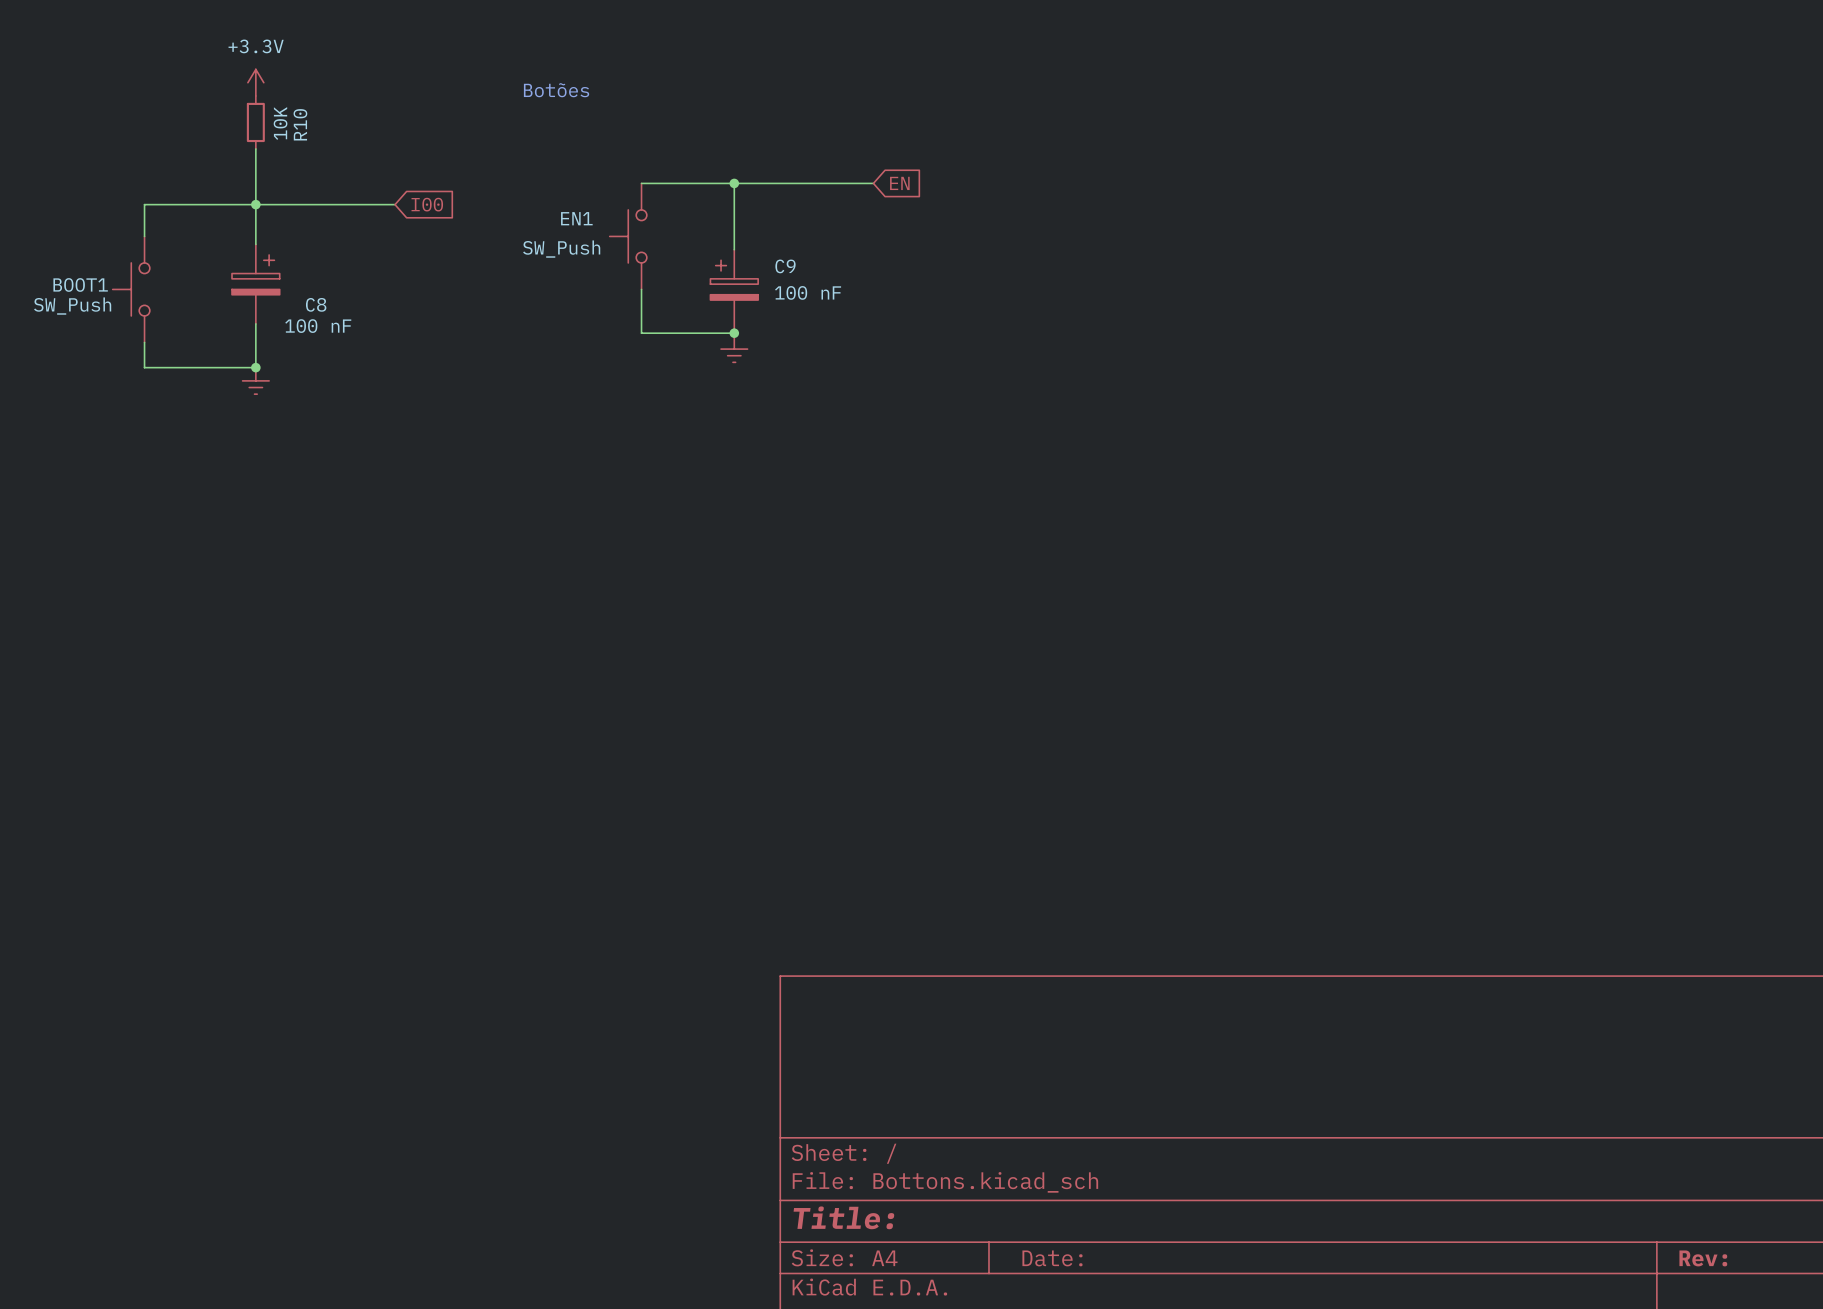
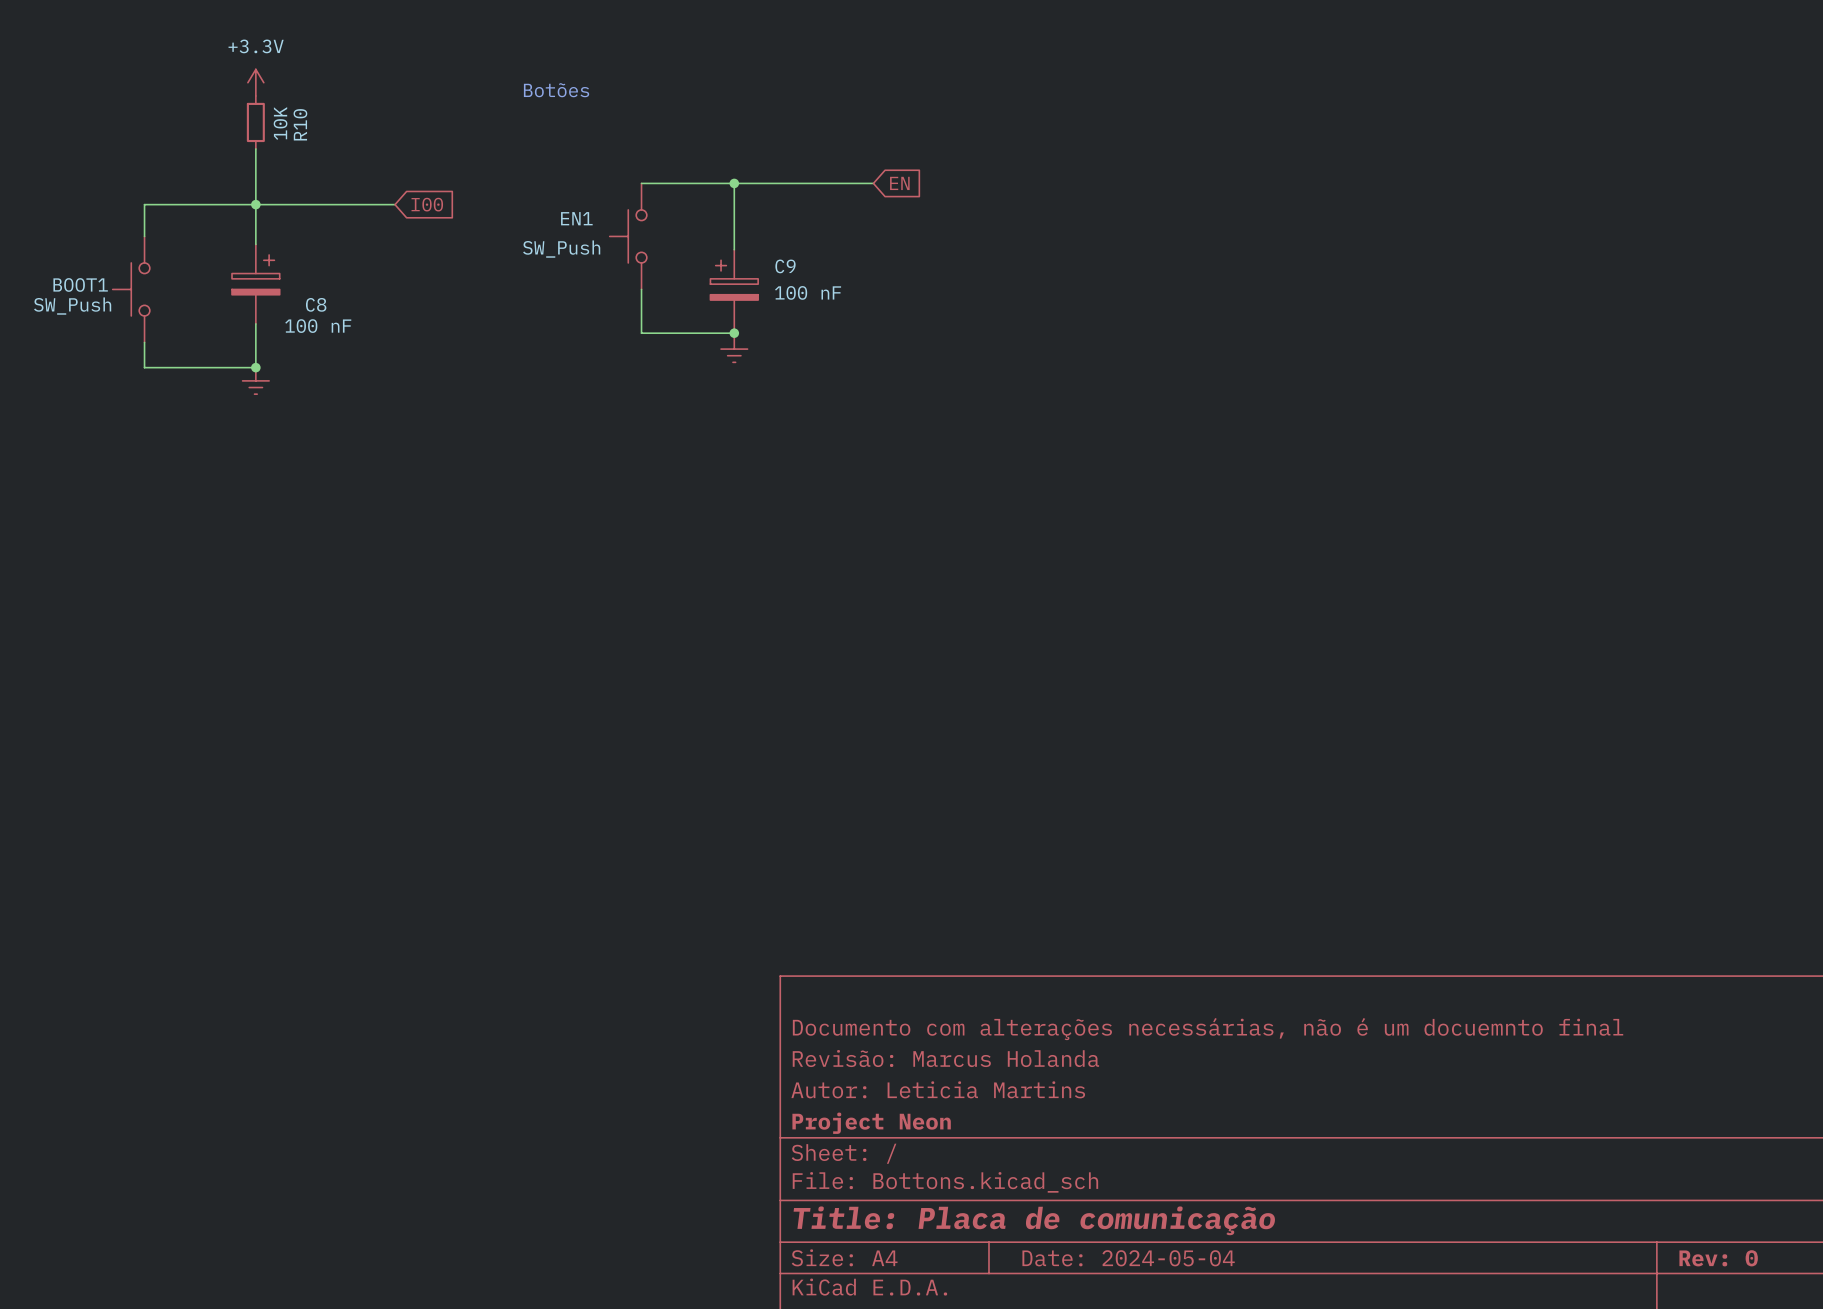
title block: none -> Documento com alterações necessárias, não é um docuemnto final (1208, 1029)
title block: none -> Revisão: Marcus Holanda (945, 1058)
title block: none -> Autor: Leticia Martins (938, 1089)
title block: none -> Project Neon (871, 1123)
title block: Title: (843, 1217) -> Title: Placa de comunicação (1034, 1220)
title block: Date: (1052, 1258) -> Date: 2024-05-04 (1128, 1258)
title block: Rev: (1703, 1258) -> Rev: 0 (1718, 1258)

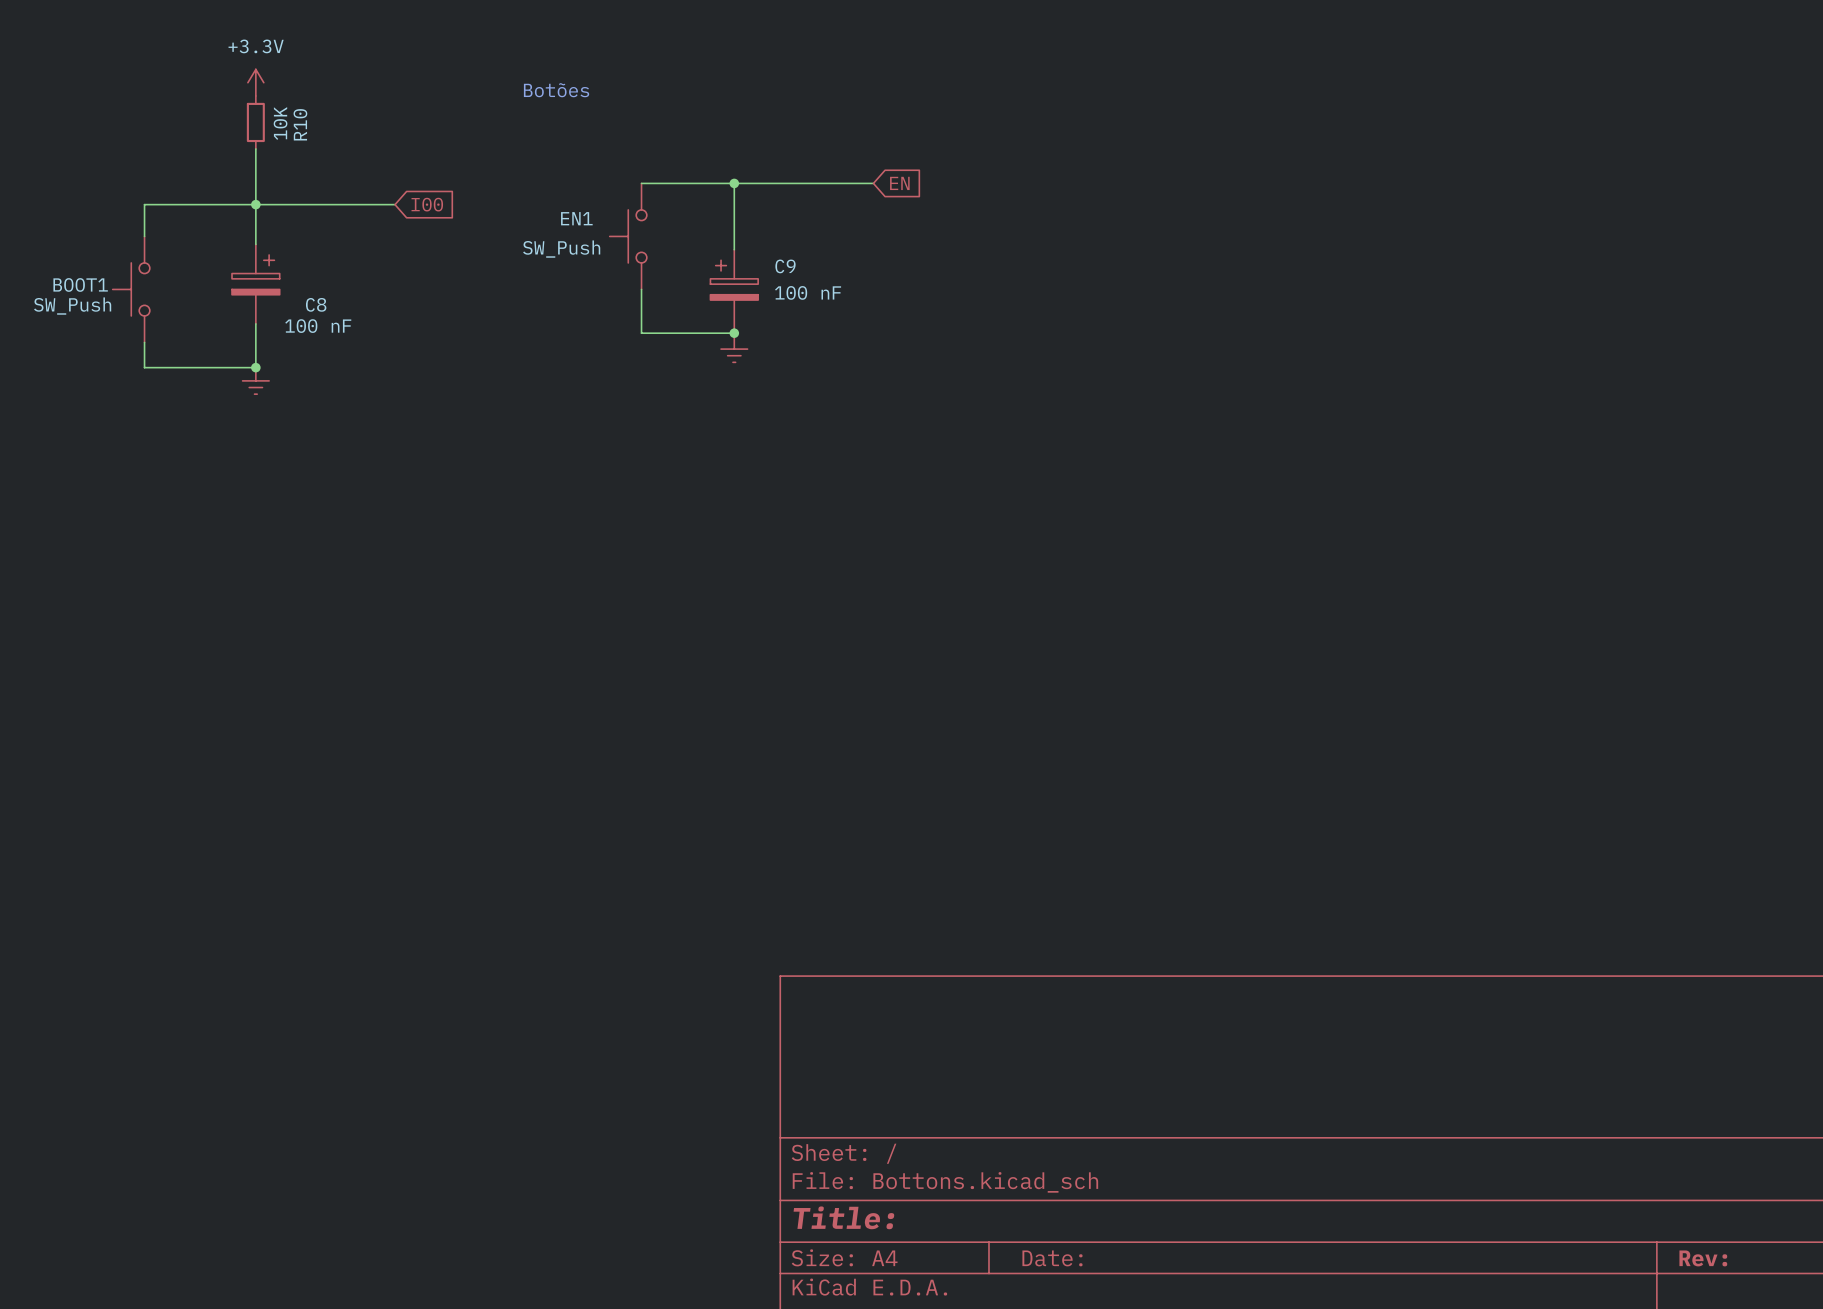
title block: Documento com alterações necessárias, não é um docuemnto final (1208, 1029) -> none
title block: Revisão: Marcus Holanda (945, 1058) -> none
title block: Autor: Leticia Martins (938, 1089) -> none
title block: Project Neon (871, 1123) -> none
title block: Title: Placa de comunicação (1034, 1220) -> Title: (843, 1217)
title block: Date: 2024-05-04 (1128, 1258) -> Date: (1052, 1258)
title block: Rev: 0 (1718, 1258) -> Rev: (1703, 1258)

